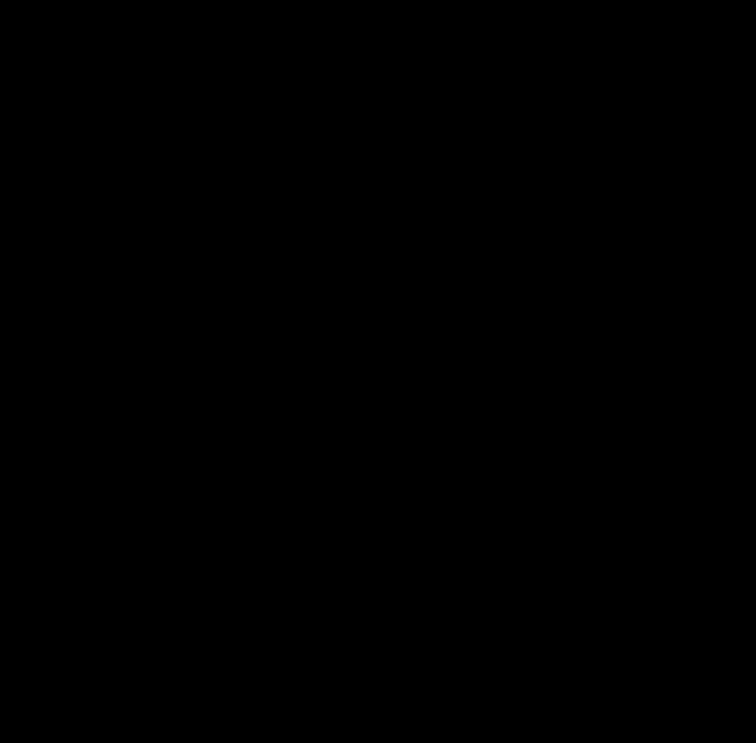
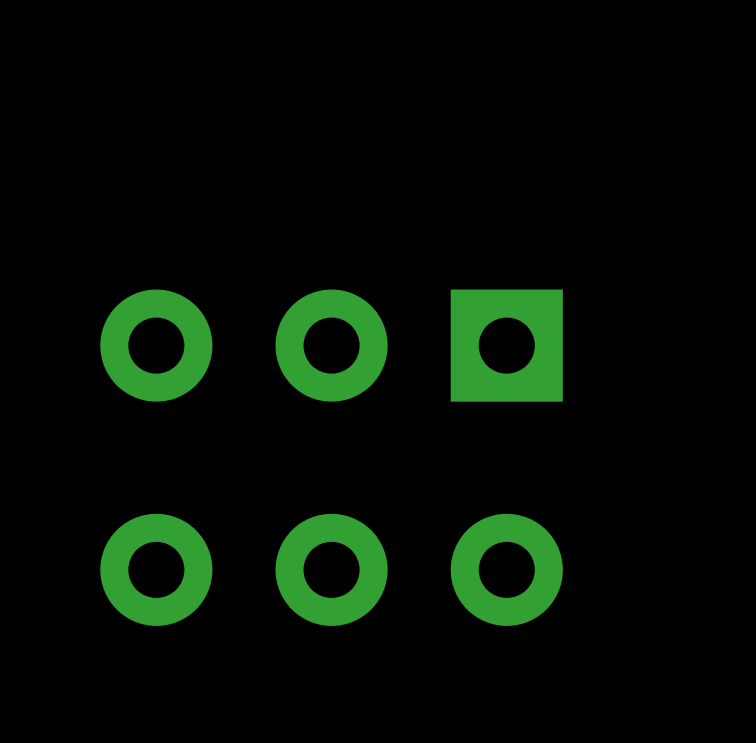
part: none -> (331, 457)

